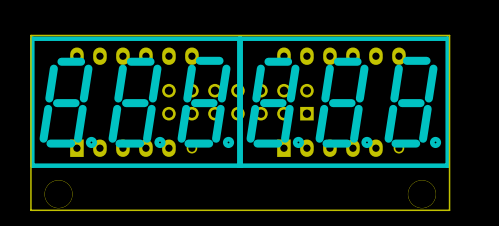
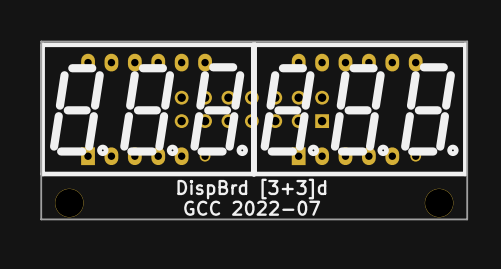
text: none -> DispBrd [3+3]d (251, 189)
text: none -> GCC 2022-07 (252, 208)

